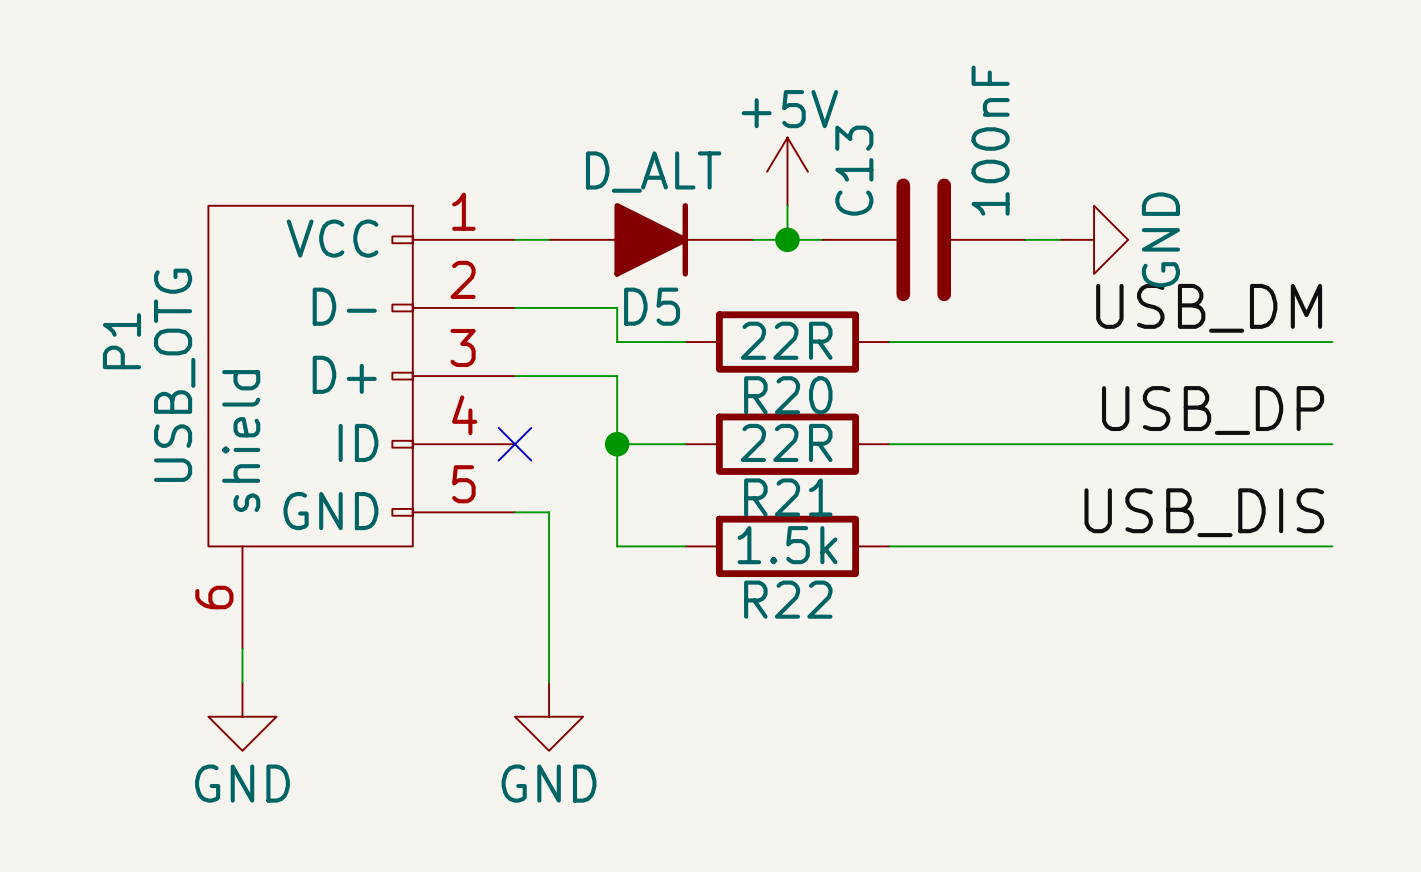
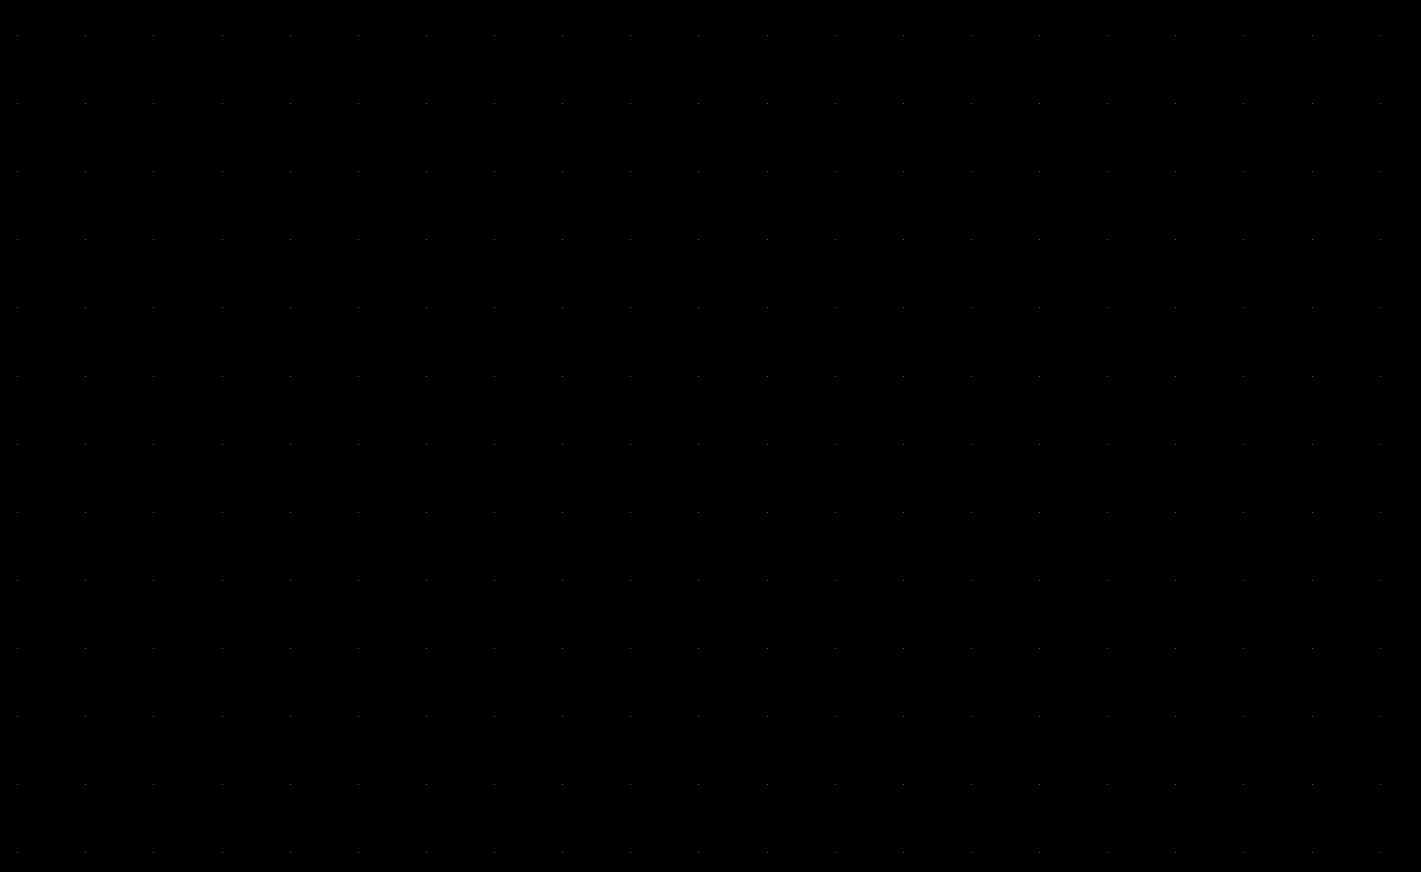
power symbol: +5V (787, 171) -> none
wire: (787, 205) (787, 239) -> none
wire: (514, 239) (549, 239) -> none
D5: D_ALT (651, 239) -> none
wire: (753, 239) (821, 239) -> none
junction: (787, 239) -> none
C13: 100nF (923, 239) -> none
wire: (1025, 239) (1060, 239) -> none
power symbol: GND (1094, 239) -> none
wire: (514, 307) (617, 307) (617, 342) (685, 342) -> none
label: USB_DM (1209, 308) -> none
R20: 22R (787, 342) -> none
wire: (889, 342) (1332, 342) -> none
wire: (514, 376) (617, 376) (617, 546) (685, 546) -> none
label: USB_DP (1213, 410) -> none
P1: USB_OTG (361, 427) -> none
no-connect mark: (514, 444) -> none
wire: (617, 444) (685, 444) -> none
junction: (617, 444) -> none
R21: 22R (787, 444) -> none
wire: (889, 444) (1332, 444) -> none
wire: (514, 512) (549, 512) (549, 682) -> none
label: USB_DIS (1204, 512) -> none
R22: 1.5k (787, 546) -> none
wire: (889, 546) (1332, 546) -> none
wire: (242, 648) (242, 682) -> none
power symbol: GND (242, 716) -> none
power symbol: GND (549, 716) -> none

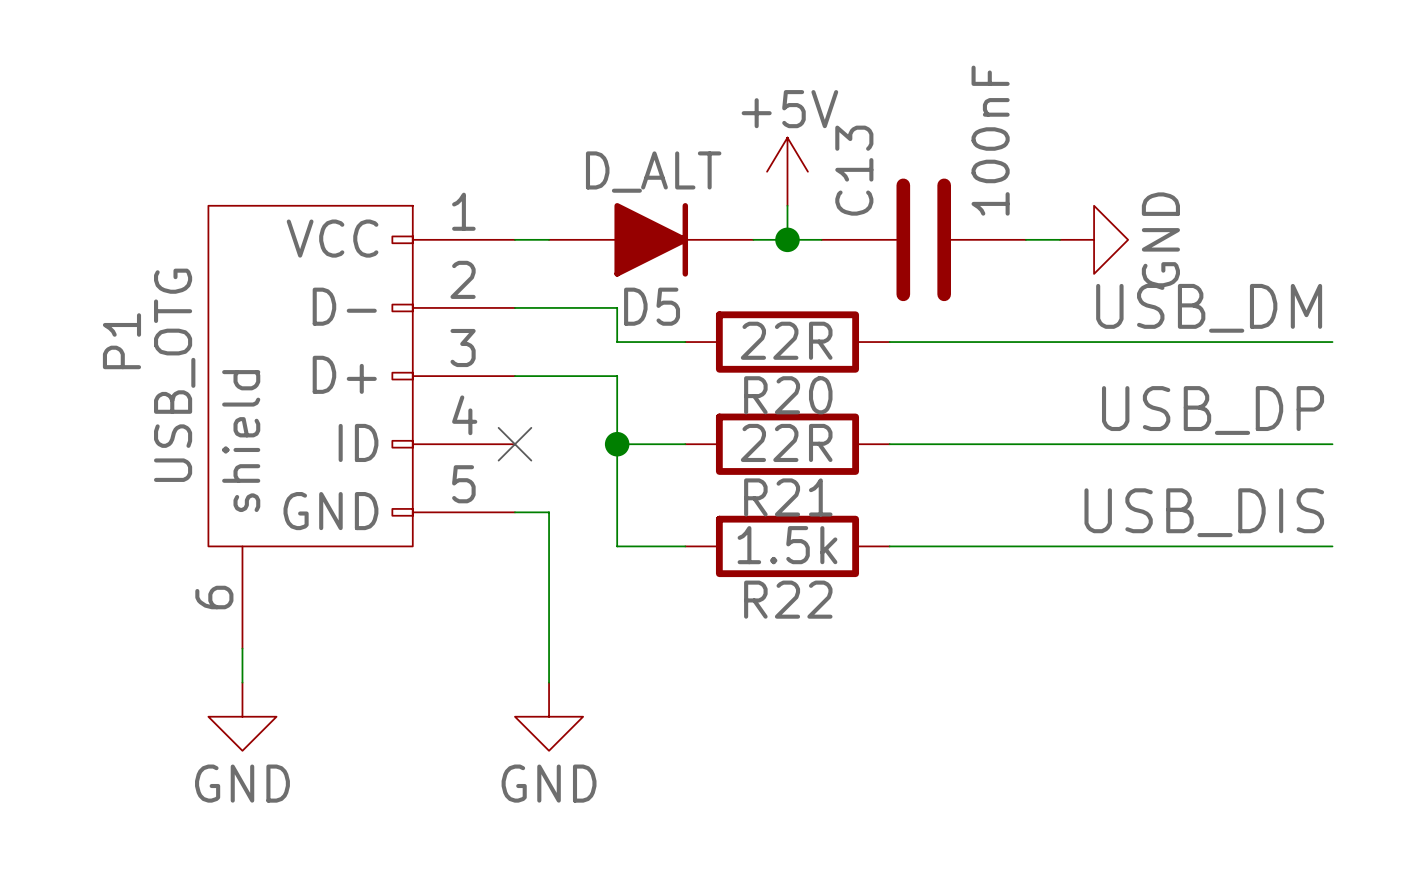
power symbol: none -> +5V (787, 171)
wire: none -> (787, 205) (787, 239)
wire: none -> (514, 239) (549, 239)
D5: none -> D_ALT (651, 239)
wire: none -> (753, 239) (821, 239)
junction: none -> (787, 239)
C13: none -> 100nF (923, 239)
wire: none -> (1025, 239) (1060, 239)
power symbol: none -> GND (1094, 239)
wire: none -> (514, 307) (617, 307) (617, 342) (685, 342)
label: none -> USB_DM (1209, 308)
R20: none -> 22R (787, 342)
wire: none -> (889, 342) (1332, 342)
wire: none -> (514, 376) (617, 376) (617, 546) (685, 546)
label: none -> USB_DP (1213, 410)
P1: none -> USB_OTG (361, 427)
no-connect mark: none -> (514, 444)
wire: none -> (617, 444) (685, 444)
junction: none -> (617, 444)
R21: none -> 22R (787, 444)
wire: none -> (889, 444) (1332, 444)
wire: none -> (514, 512) (549, 512) (549, 682)
label: none -> USB_DIS (1204, 512)
R22: none -> 1.5k (787, 546)
wire: none -> (889, 546) (1332, 546)
wire: none -> (242, 648) (242, 682)
power symbol: none -> GND (242, 716)
power symbol: none -> GND (549, 716)

